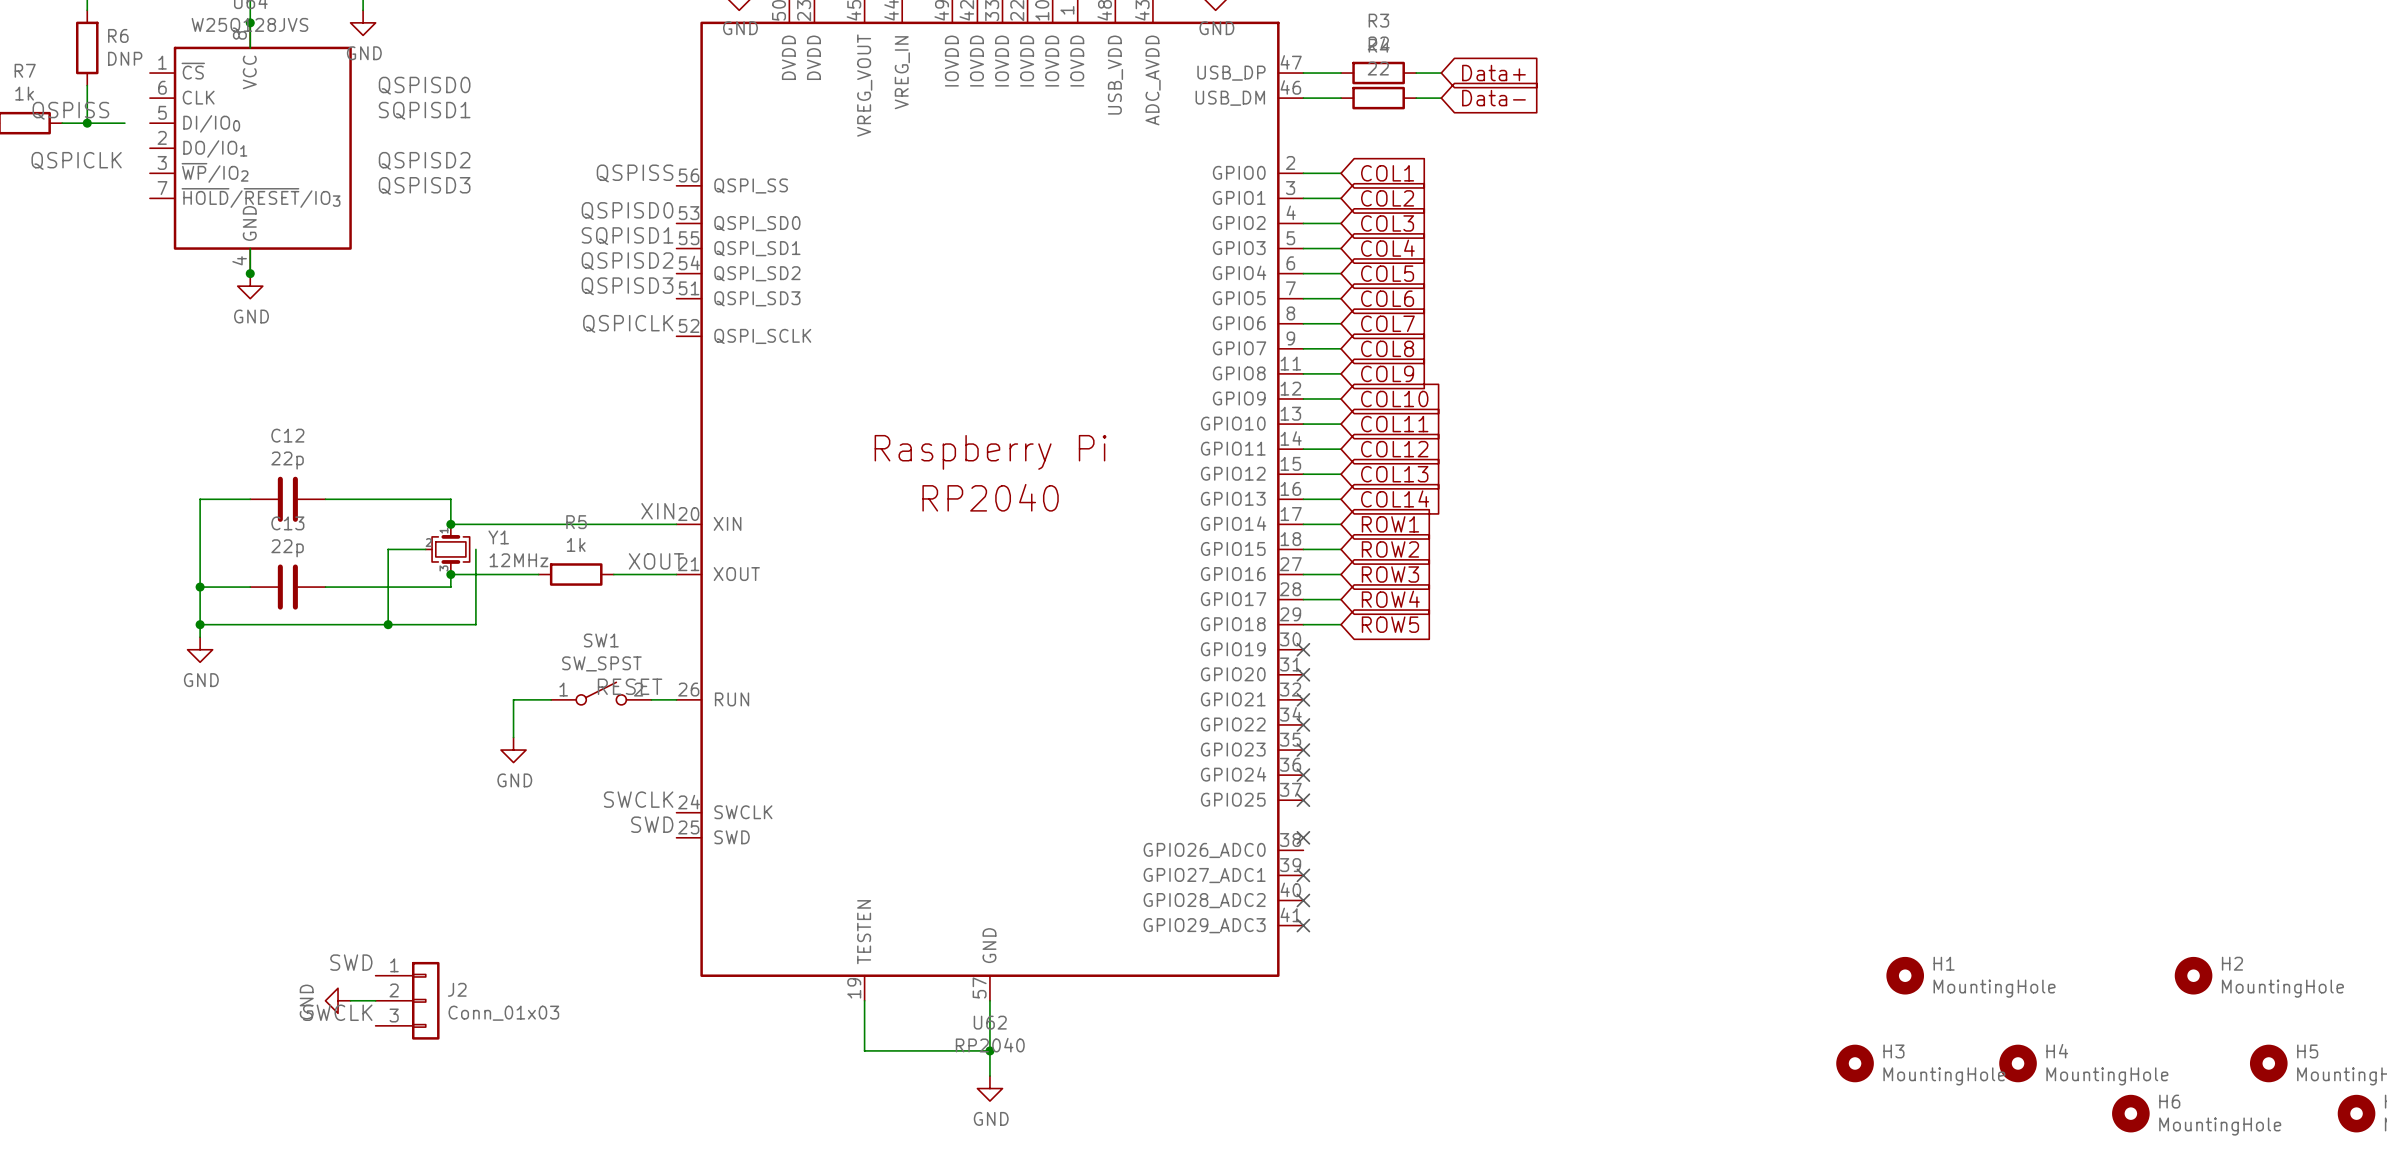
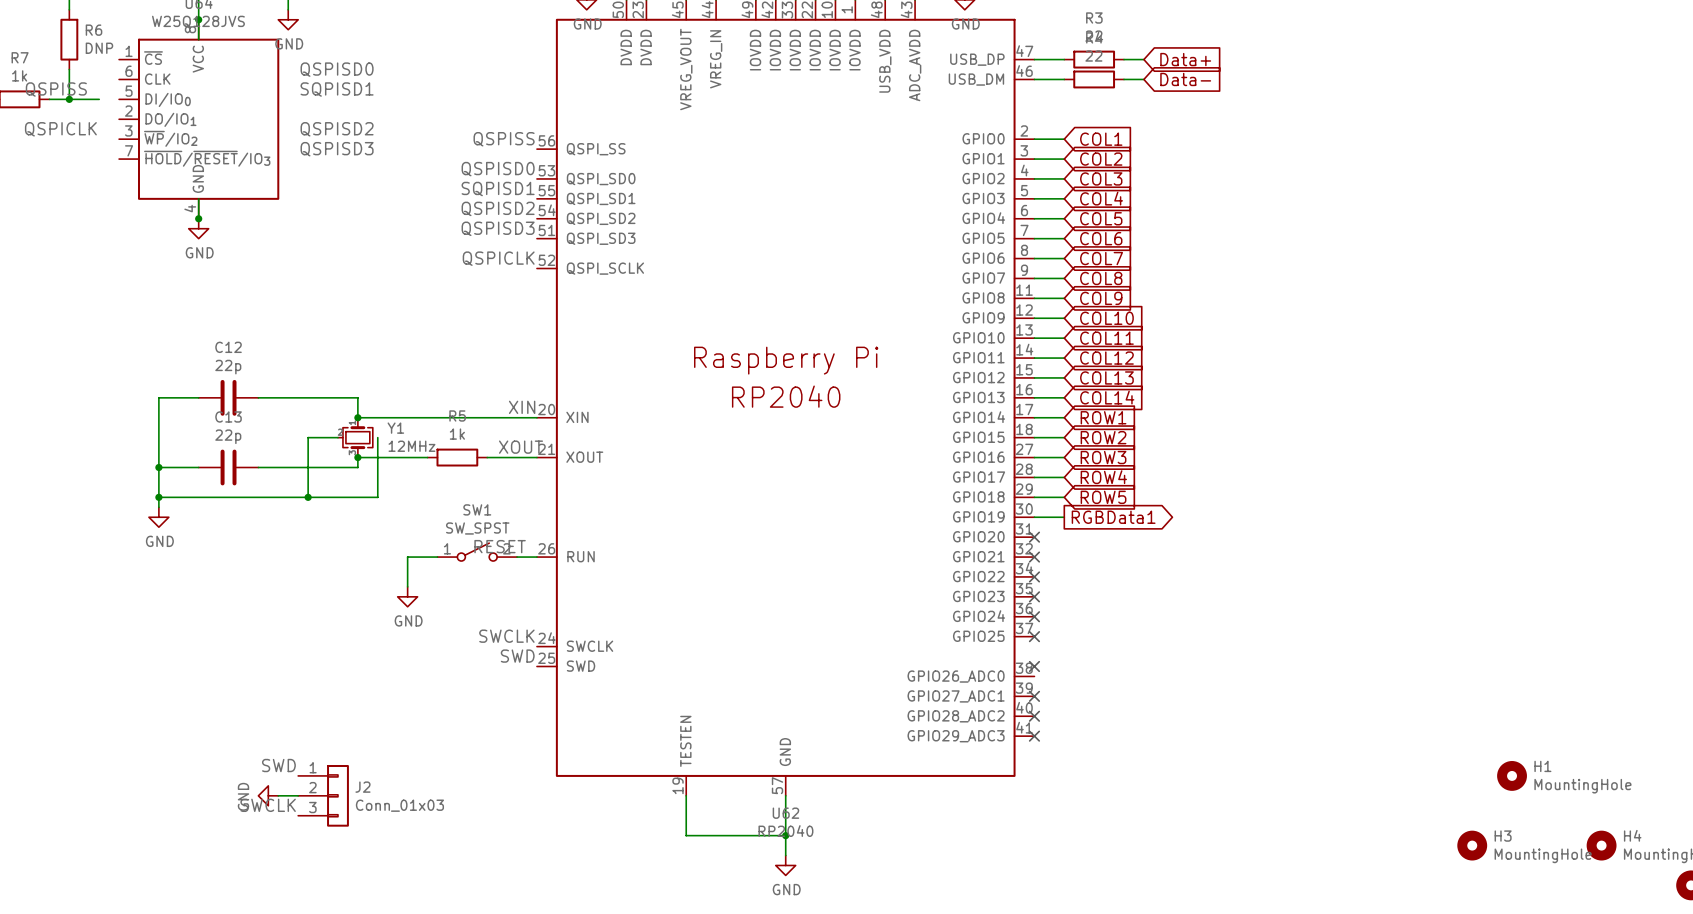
wire: none -> (1034, 517) (1064, 517)
no-connect mark: (1303, 649) -> none
global label: none -> RGBData1 (1113, 517)

